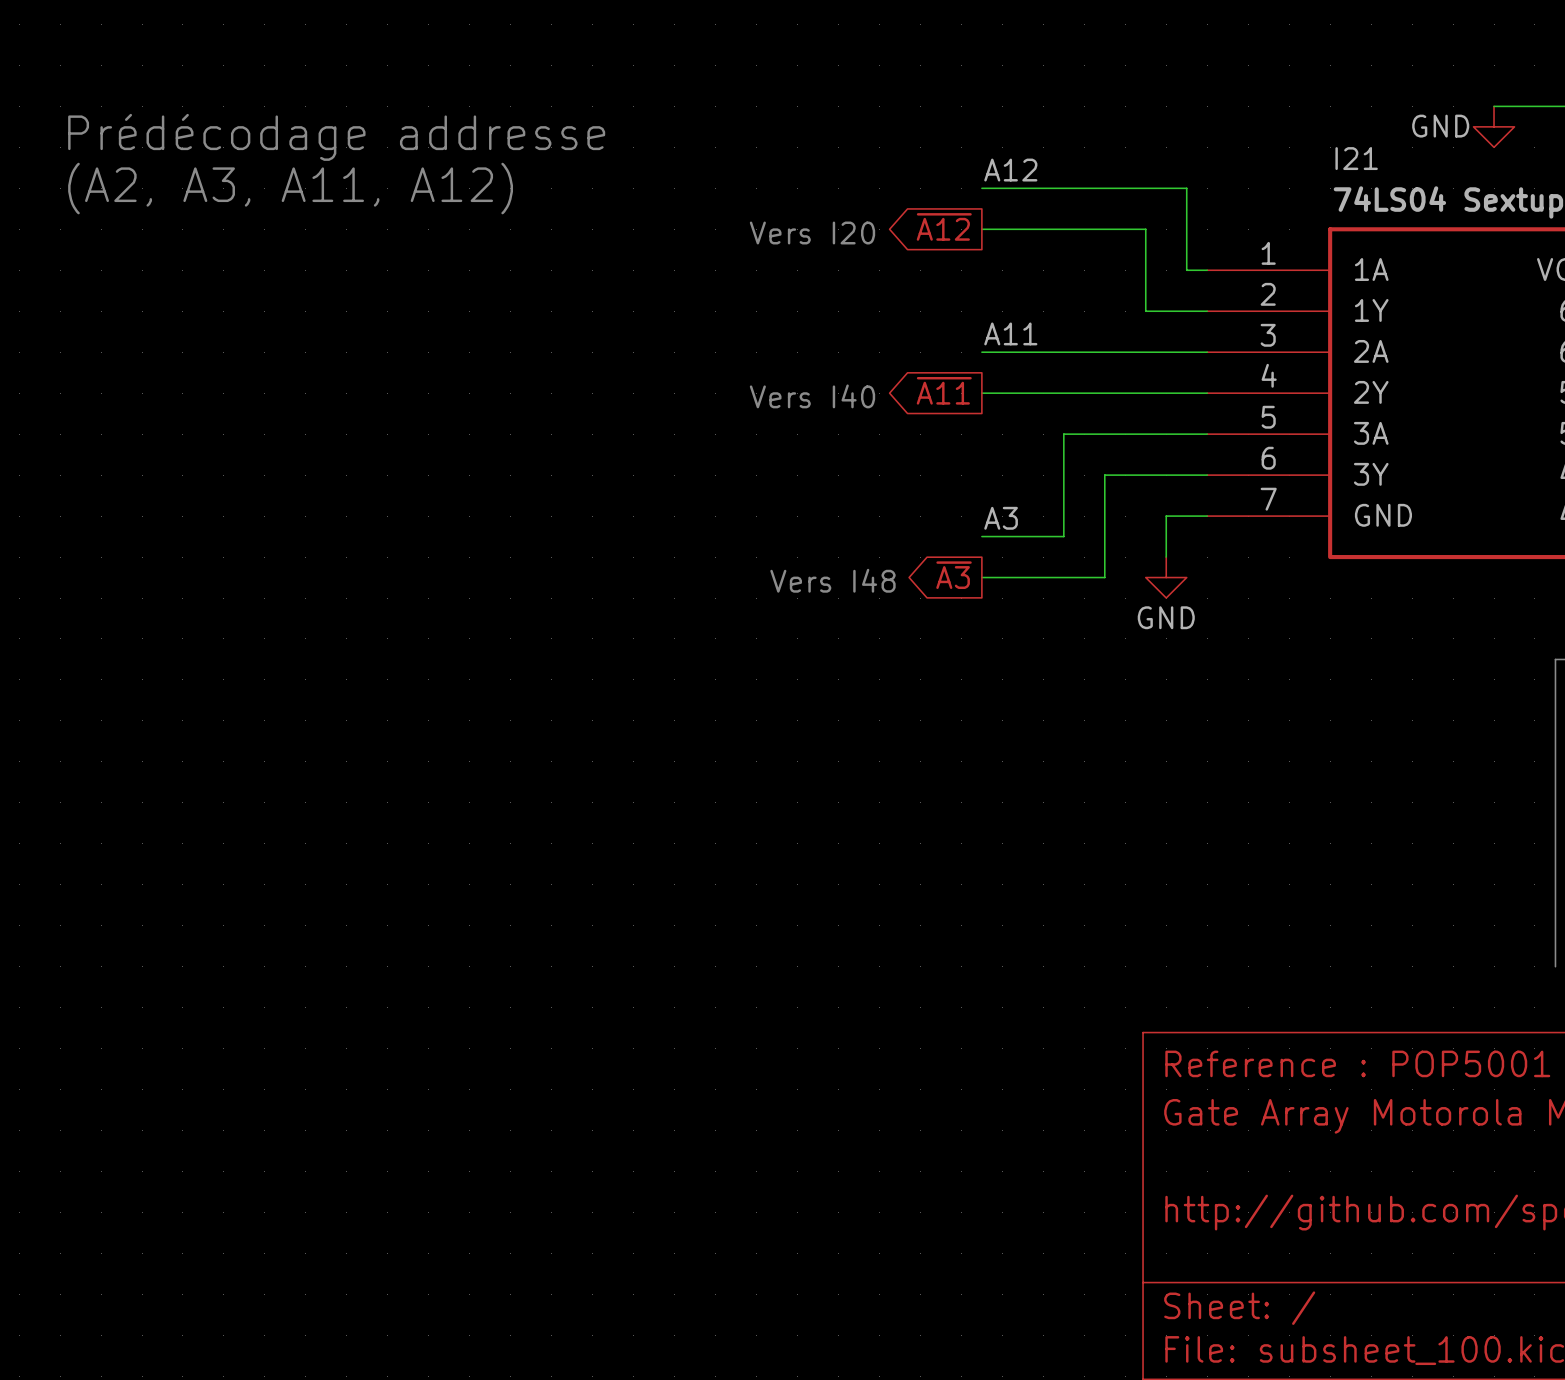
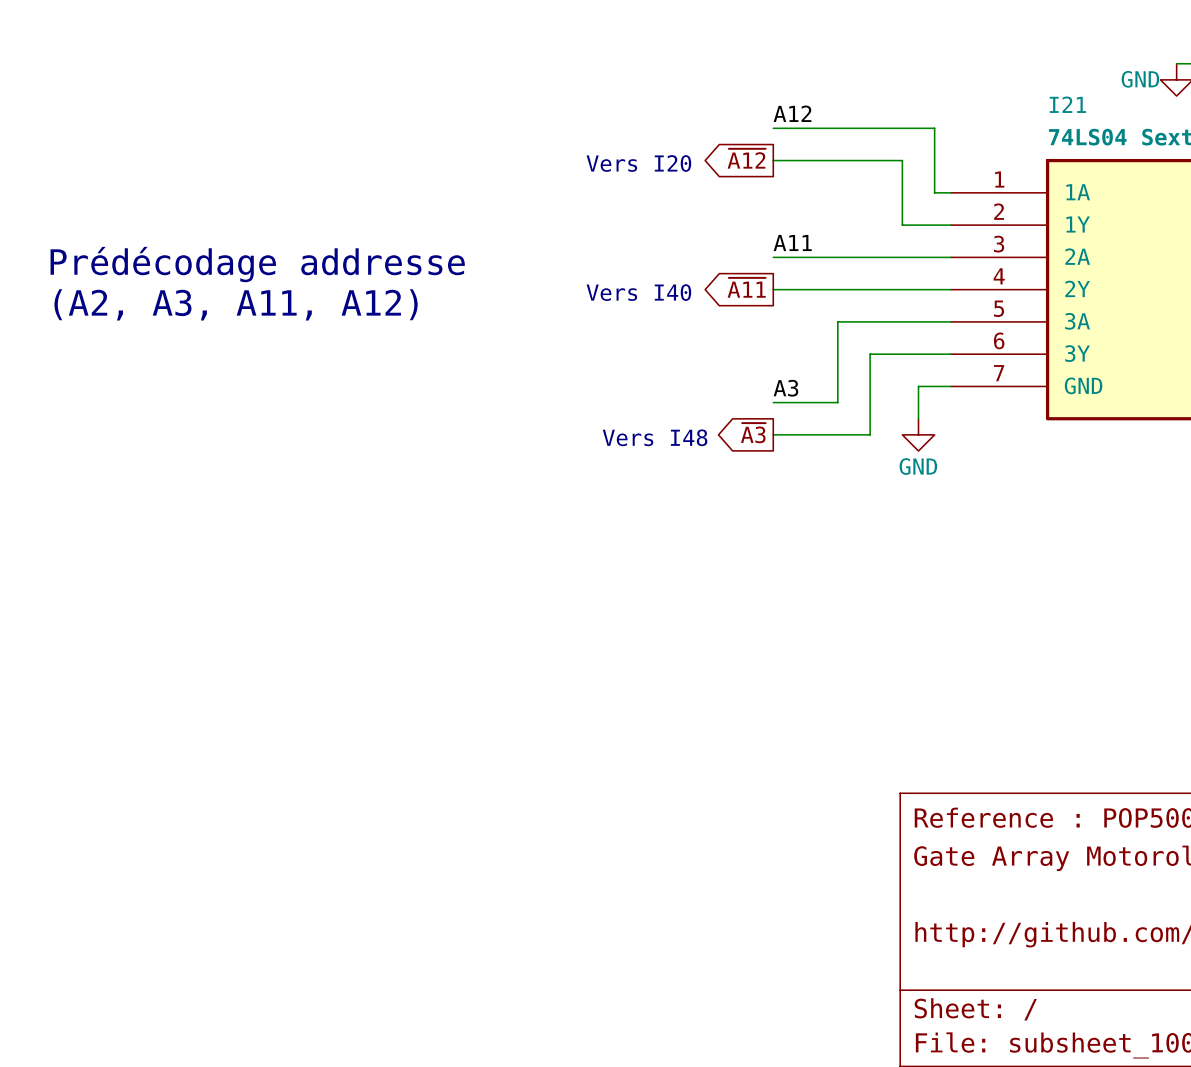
text position: Prédécodage addresse (336, 137) -> Prédécodage addresse (257, 264)
text position: (A2, A3, A11, A12) (290, 188) -> (A2, A3, A11, A12) (236, 304)

